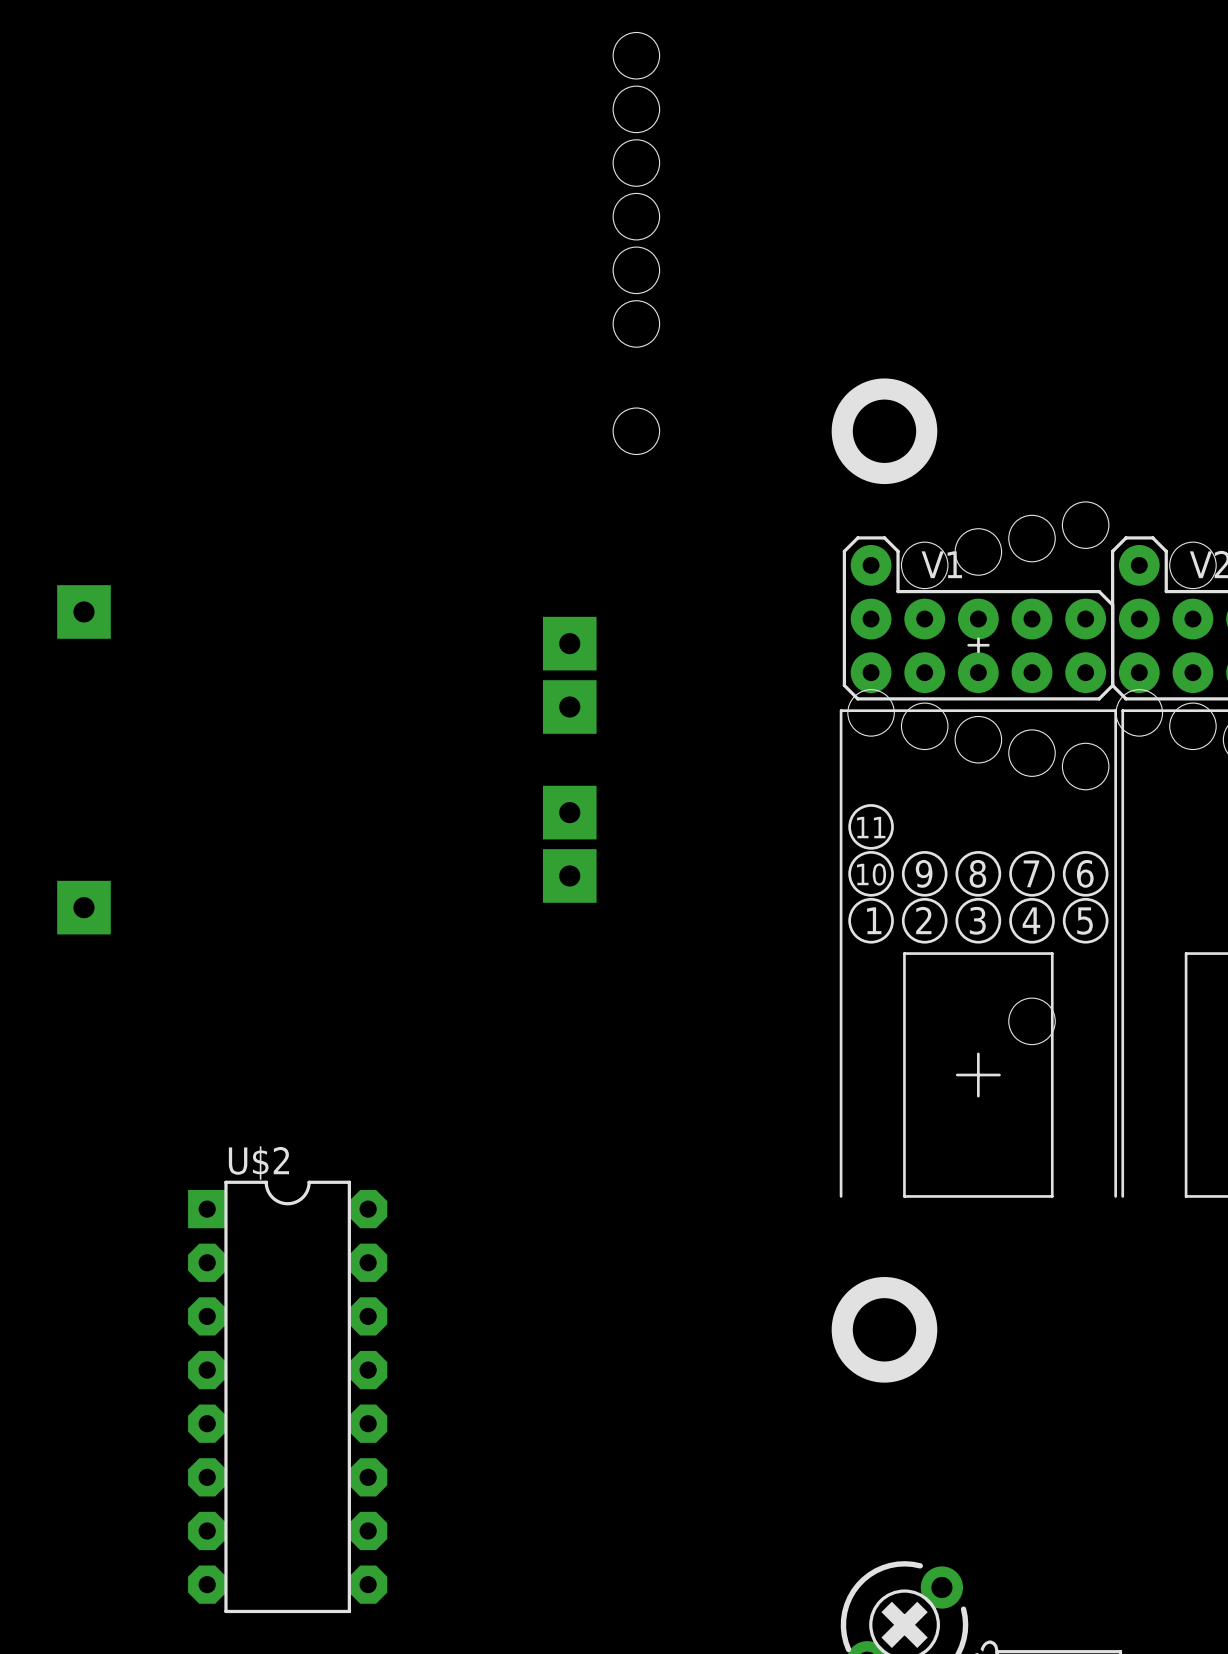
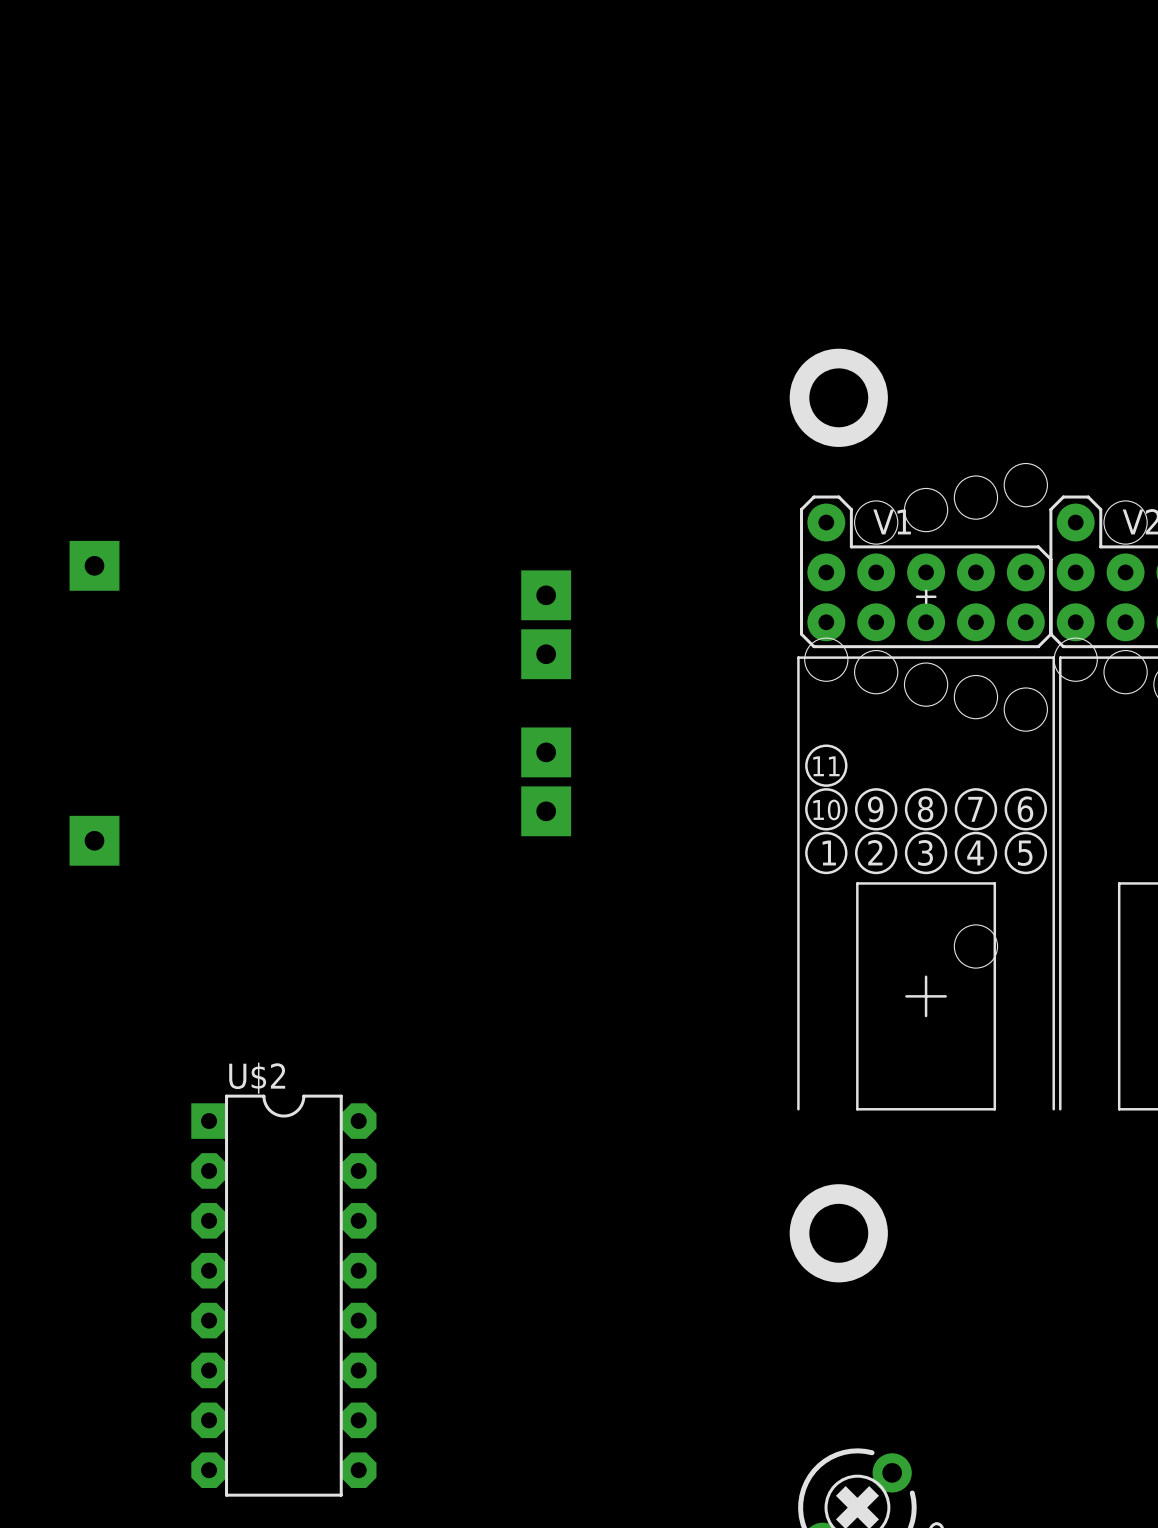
part: (636, 55) -> none
part: (636, 109) -> none
part: (636, 163) -> none
part: (636, 216) -> none
part: (636, 270) -> none
part: (636, 323) -> none
part: (636, 431) -> none

